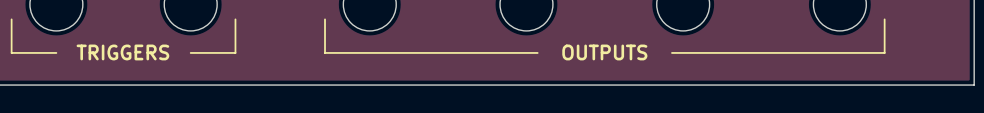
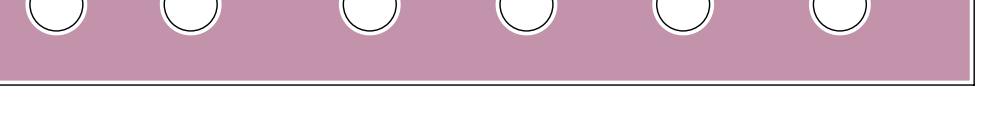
line: (11, 19) (11, 52) (56, 52) -> none
line: (235, 19) (235, 52) (190, 52) -> none
line: (325, 19) (325, 52) (537, 52) -> none
line: (884, 19) (884, 52) (671, 52) -> none
text: TRIGGERS (122, 52) -> none
text: OUTPUTS (604, 52) -> none

